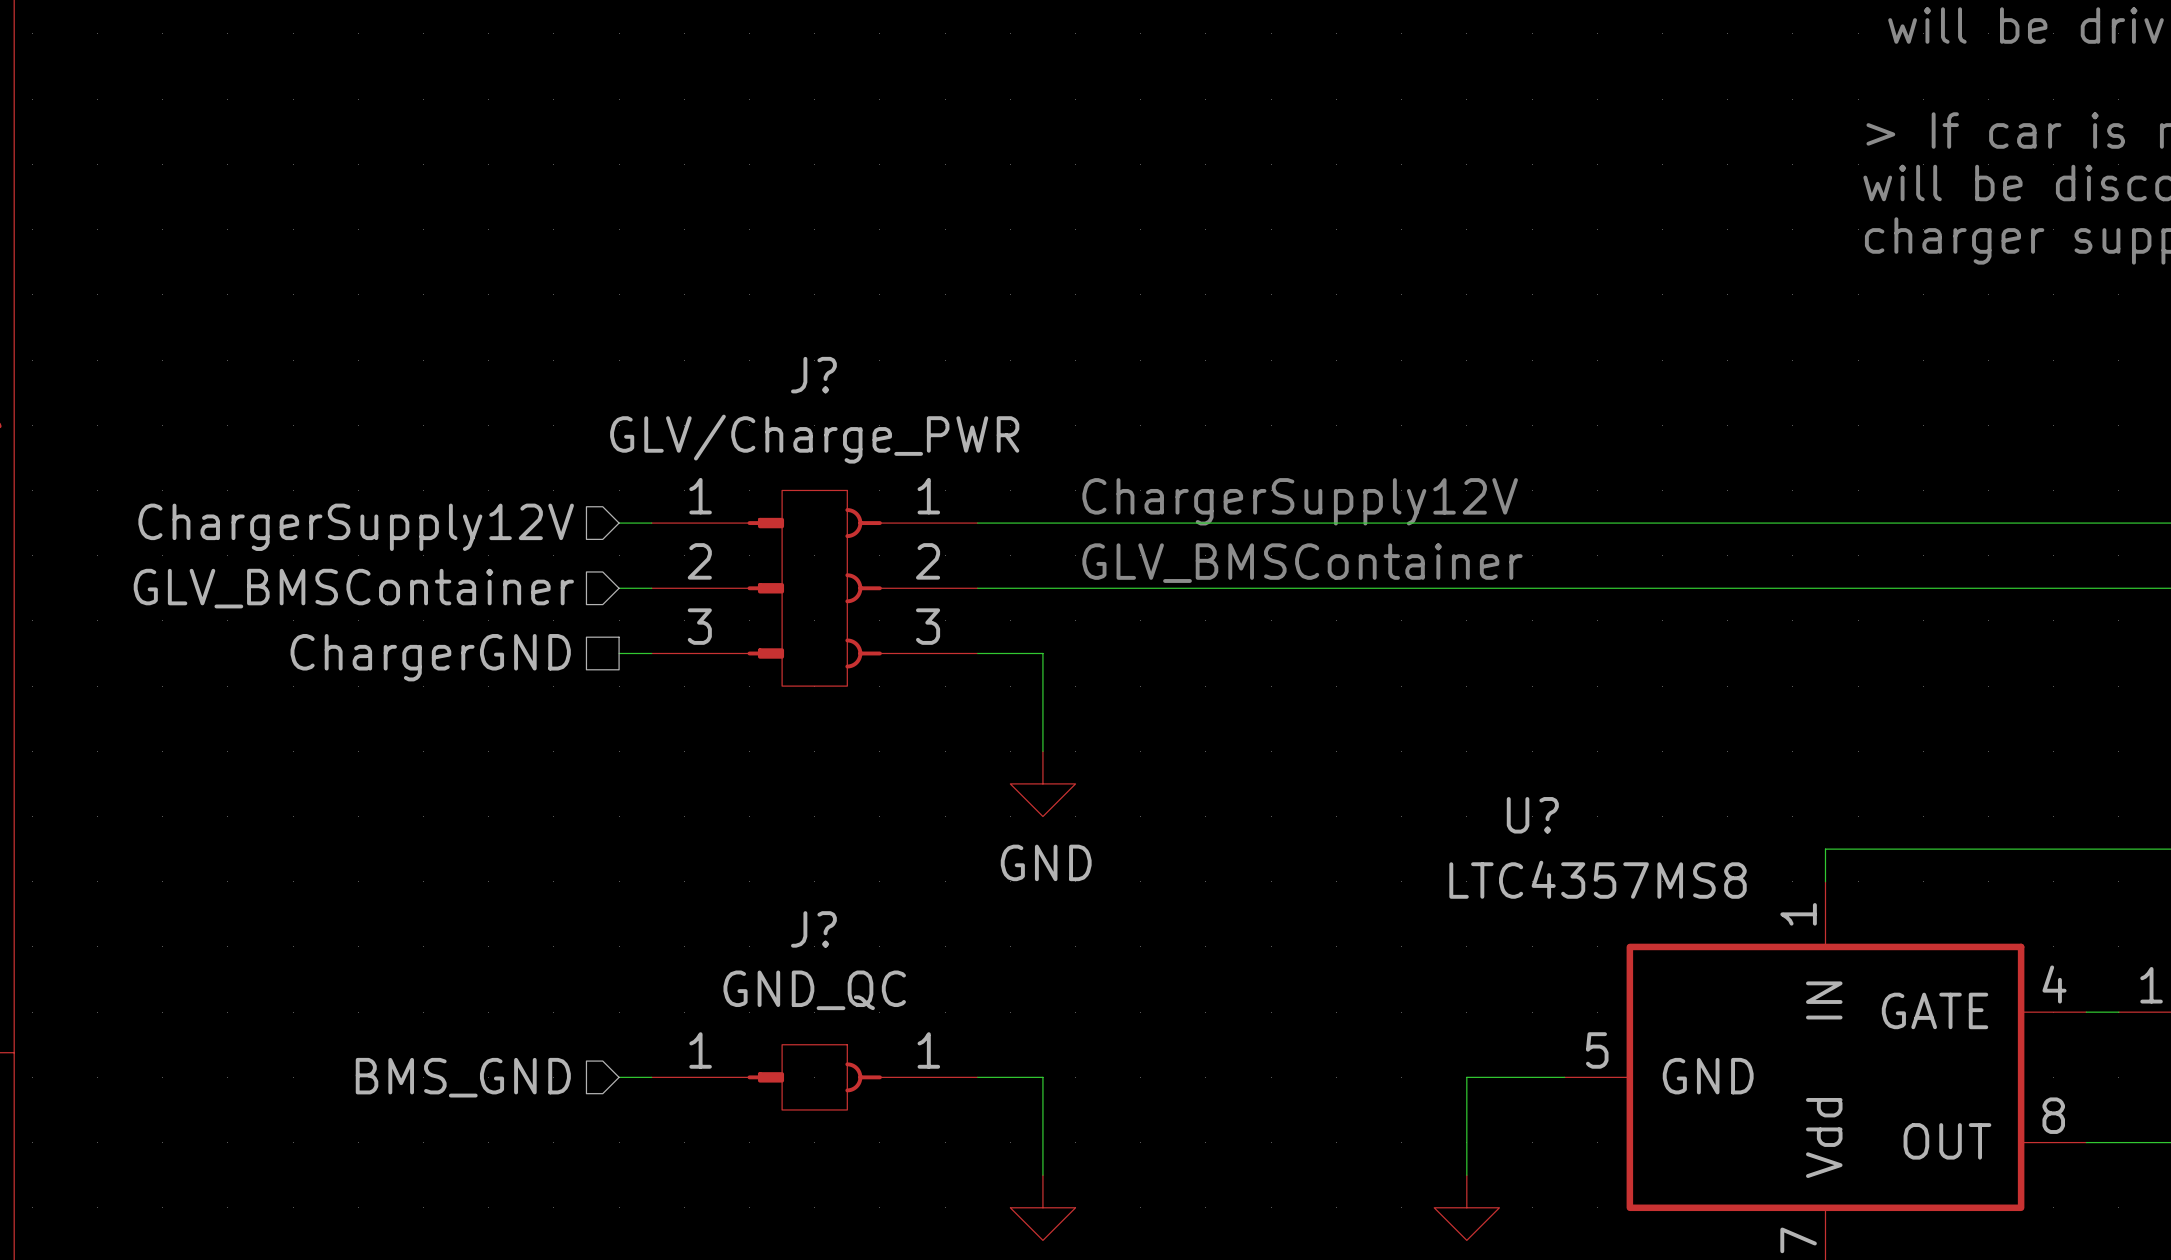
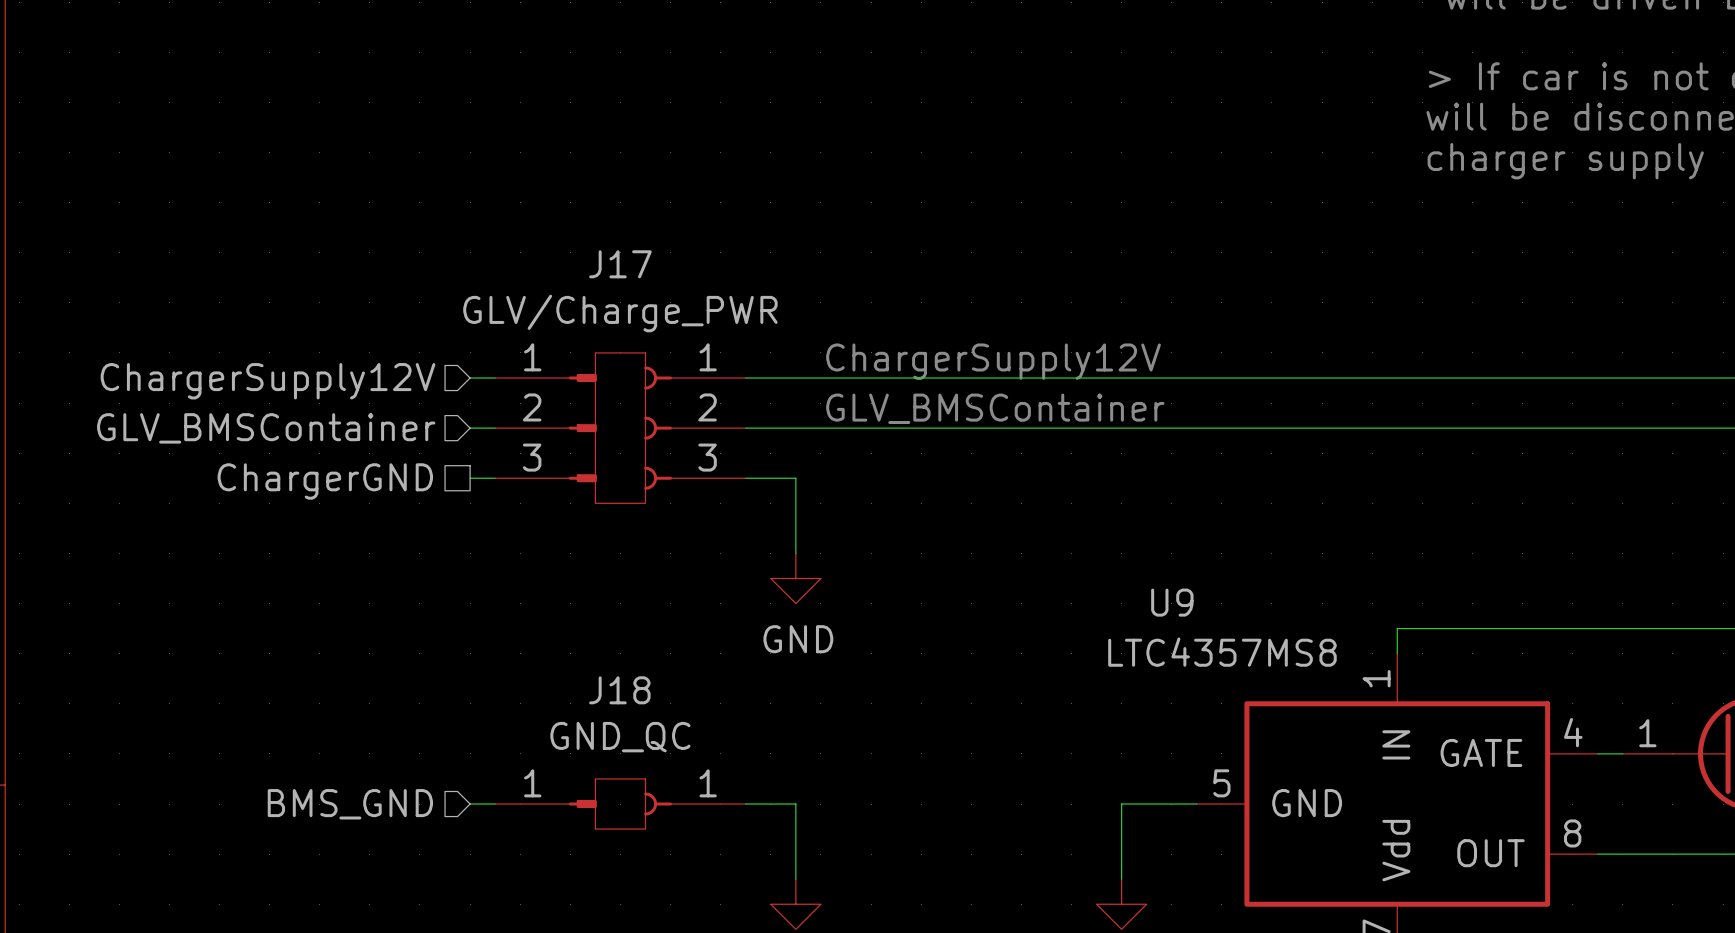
J? name: J? (813, 375) -> J17 (620, 264)
U? name: U? (1532, 815) -> U9 (1172, 602)
J? name: J? (813, 929) -> J18 (619, 690)

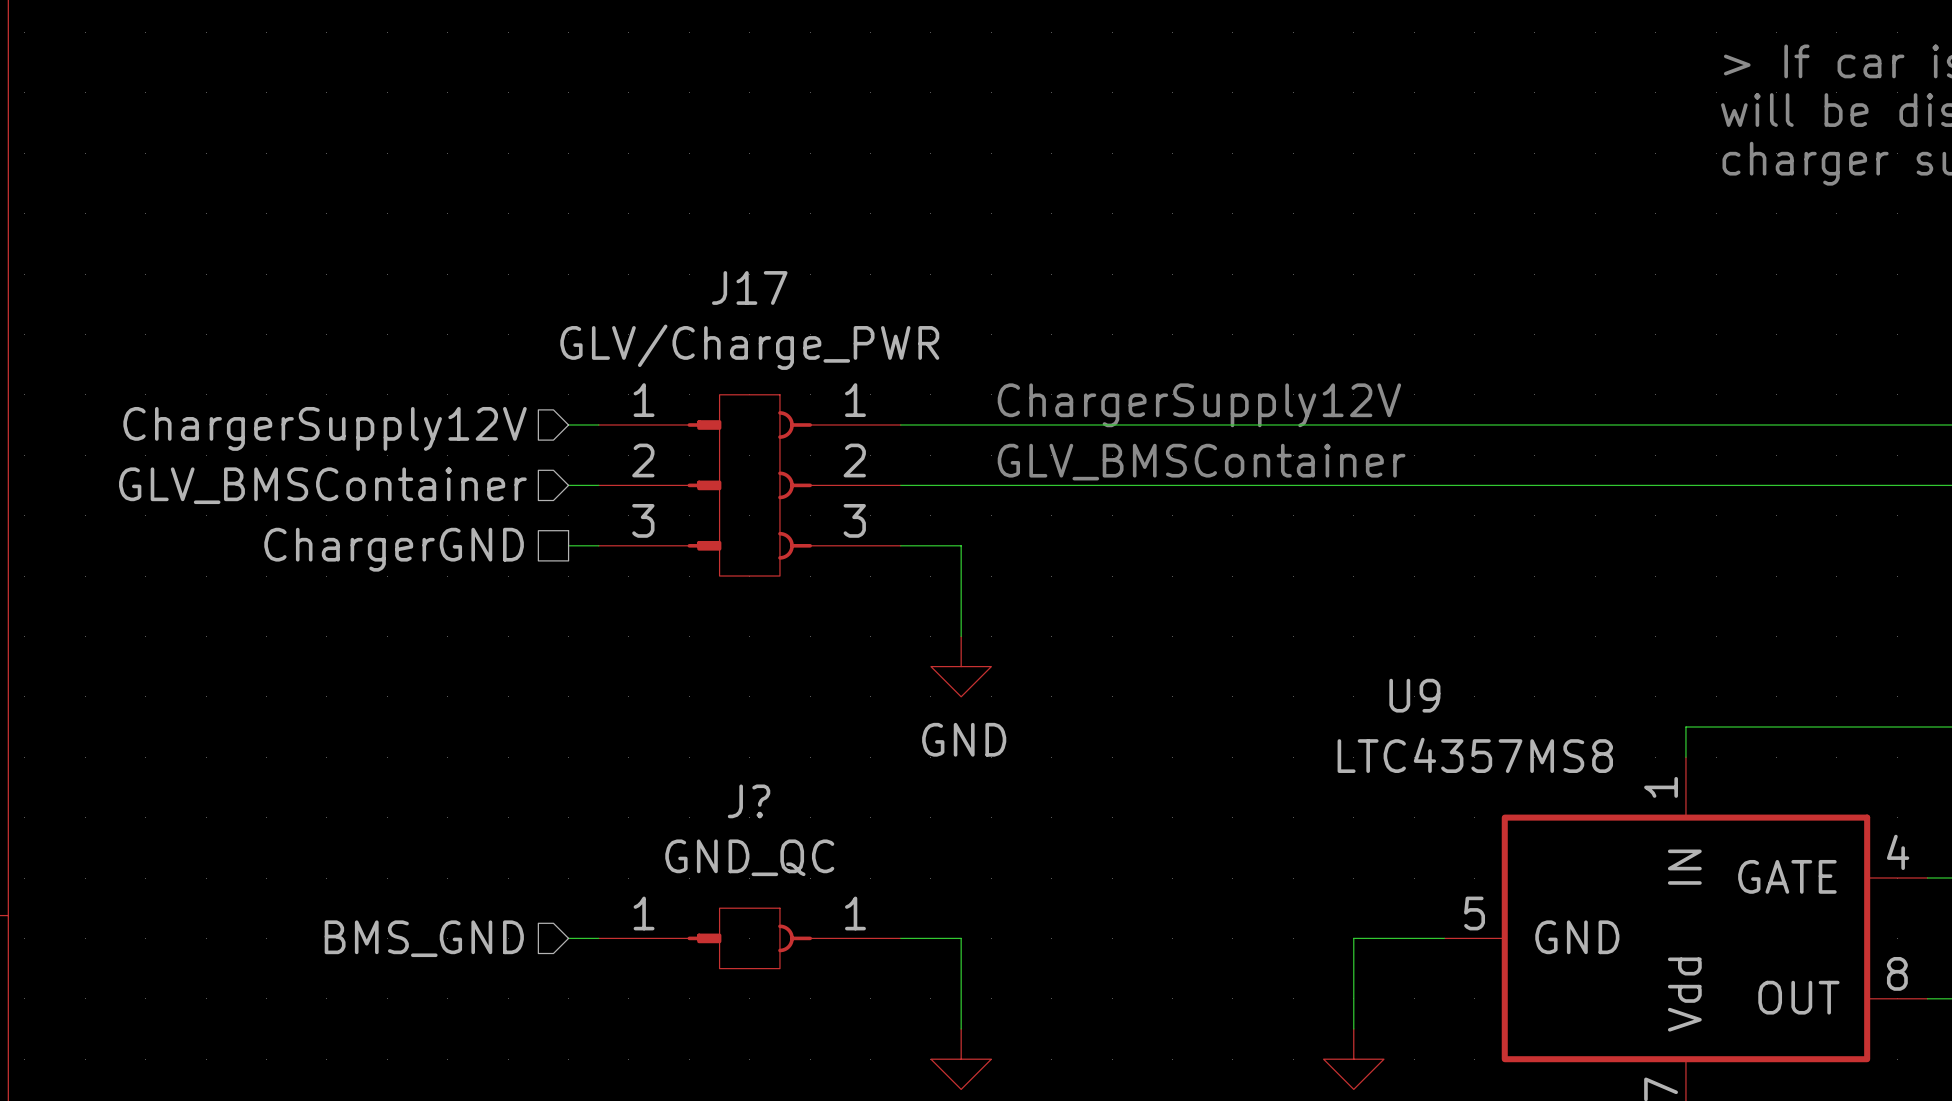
J18 name: J18 (619, 690) -> J? (749, 801)

